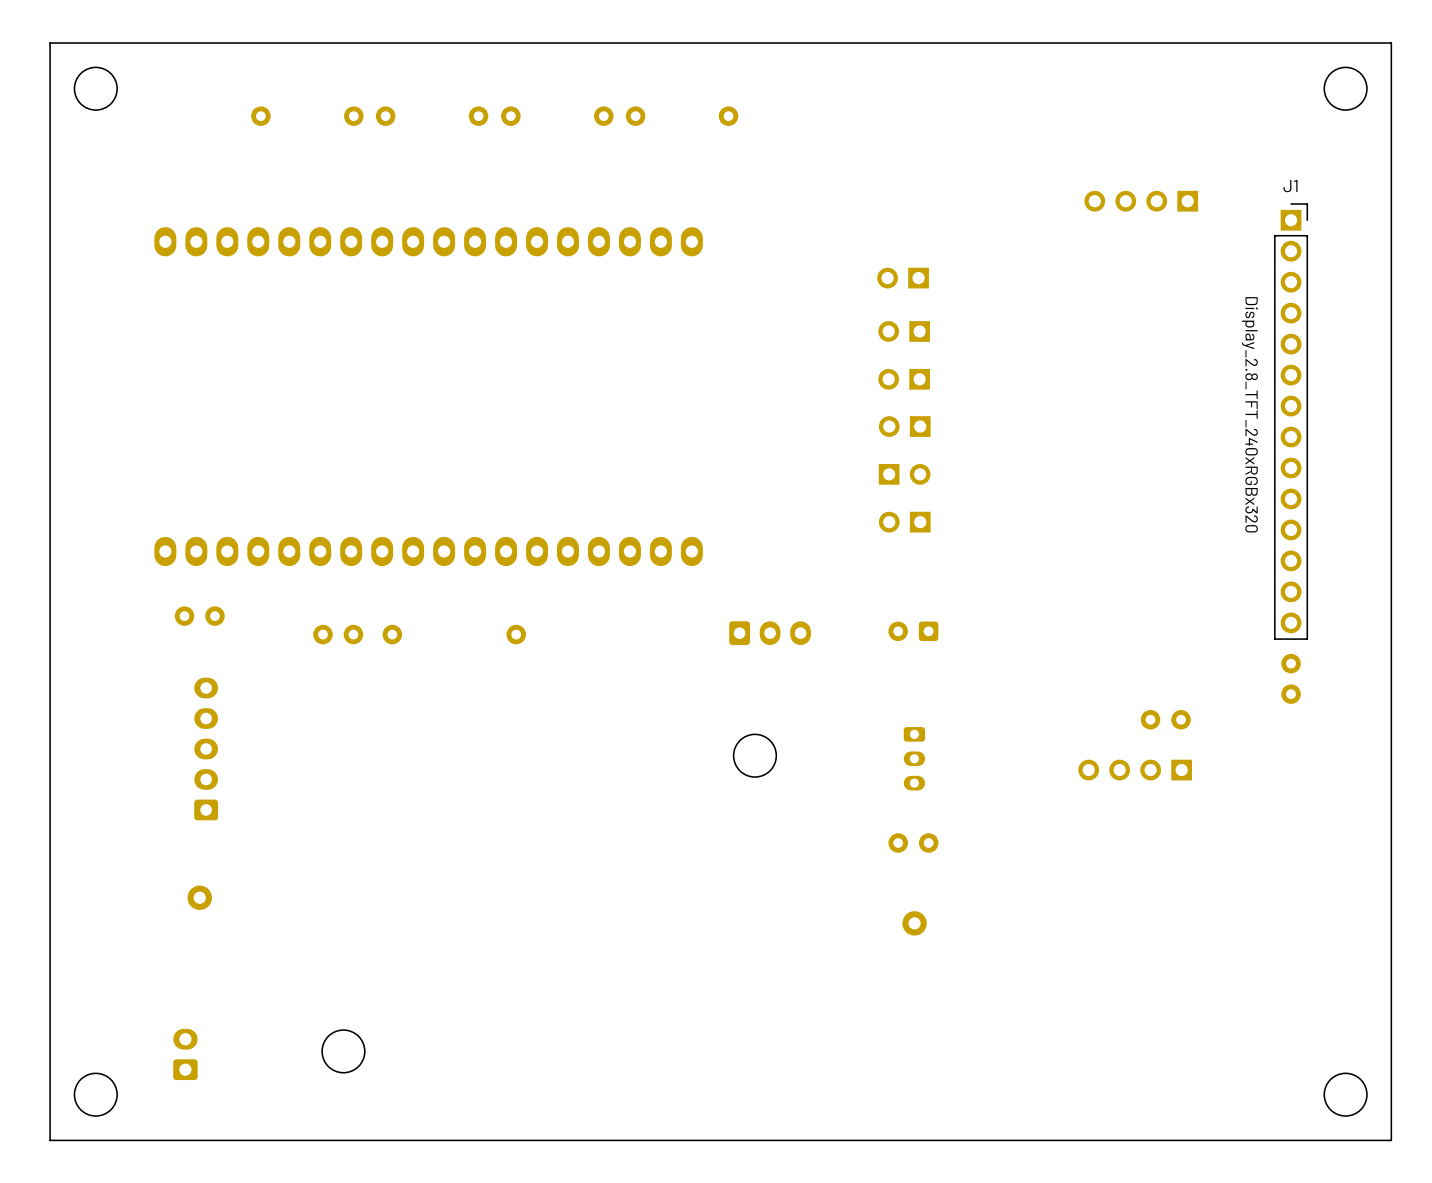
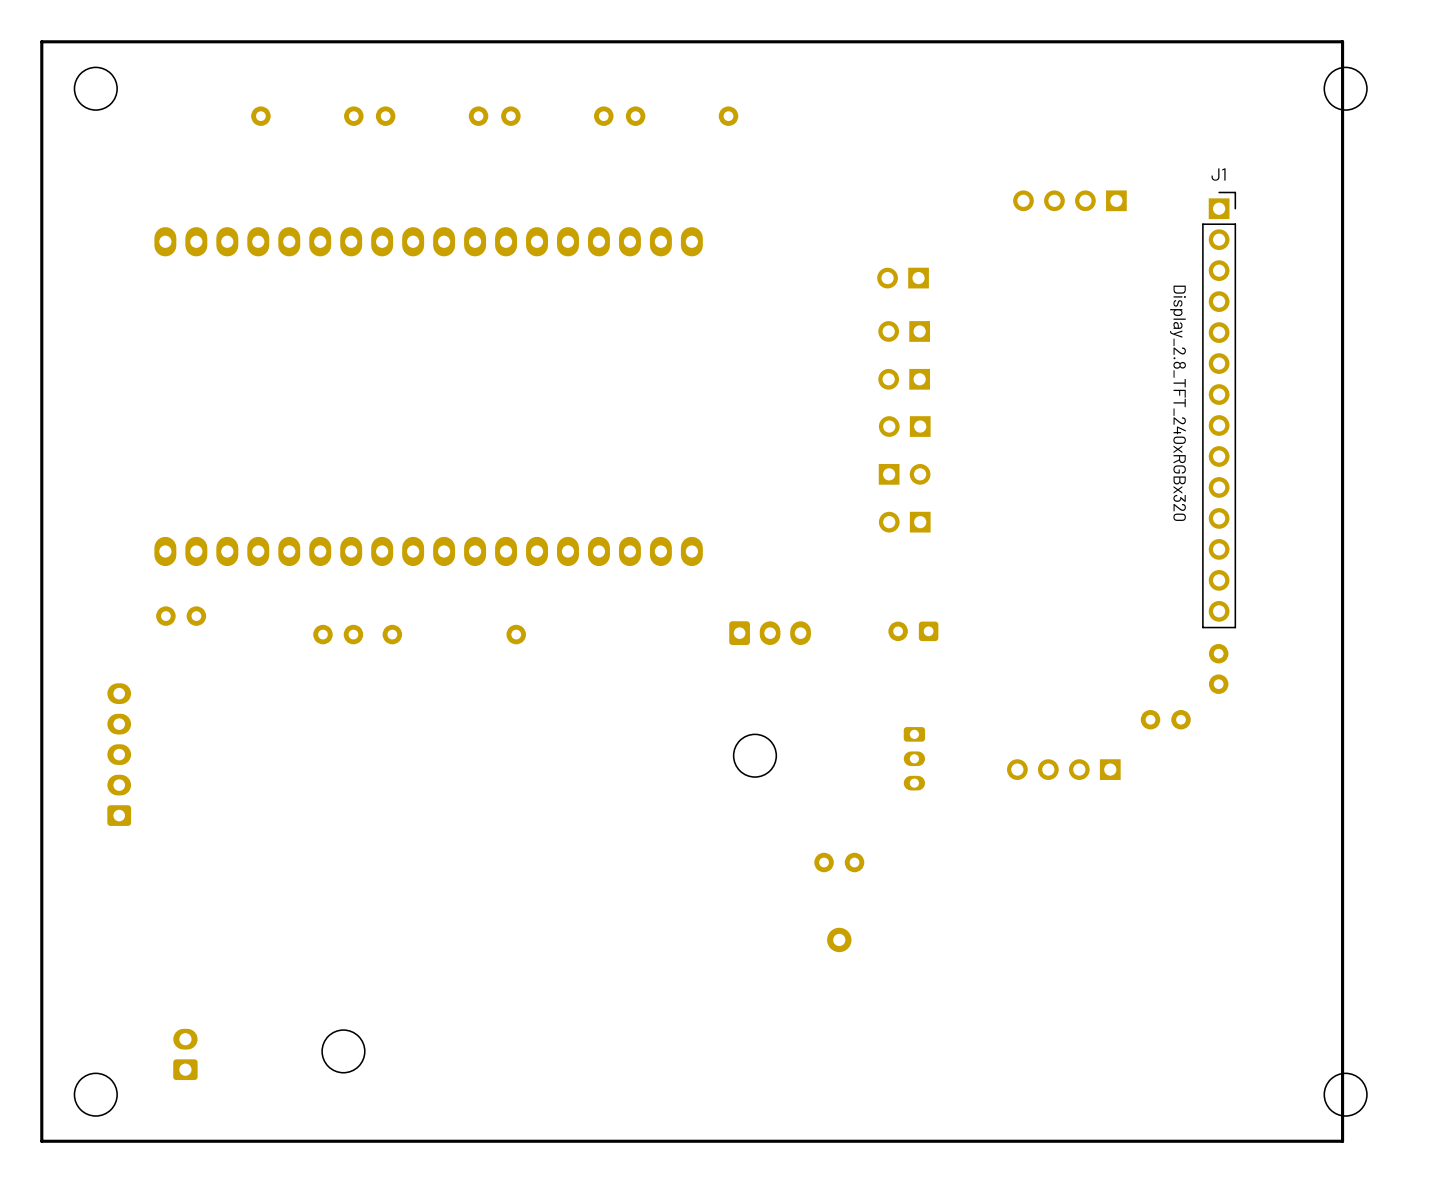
board edge: (1391, 43) (50, 43) (50, 1140) (1391, 1140) (1391, 43) -> (1342, 41) (1342, 1141) (41, 1141) (41, 41) (1342, 41)
part position: (1141, 201) -> (1069, 200)
J1 position: (1291, 421) -> (1219, 410)
part position: (199, 616) -> (181, 616)
part position: (1291, 678) -> (1218, 668)
part position: (206, 749) -> (119, 754)
part position: (1135, 770) -> (1063, 769)
part position: (913, 842) -> (839, 862)
part: (199, 897) -> none
part position: (914, 923) -> (839, 939)

